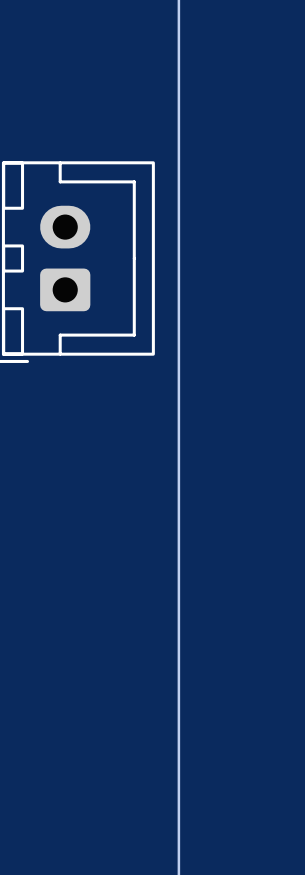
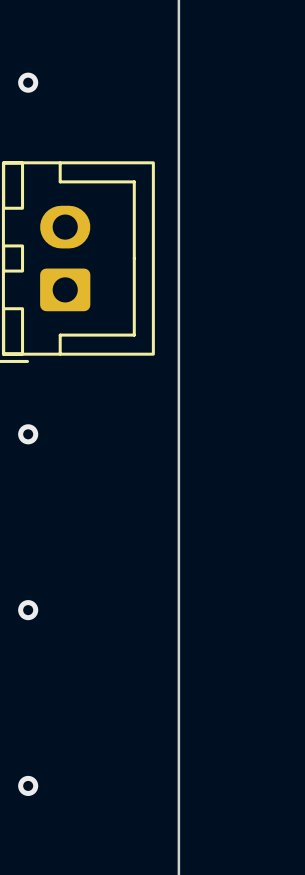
via: none -> (28, 82)
via: none -> (28, 434)
via: none -> (28, 610)
via: none -> (28, 785)

